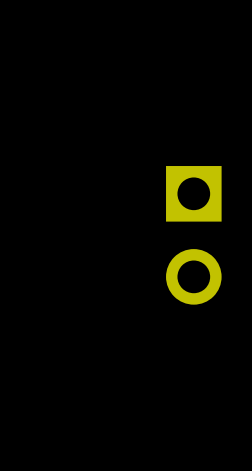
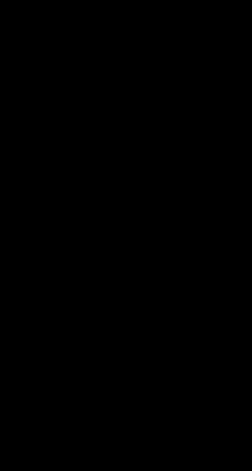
part: (193, 235) -> none

